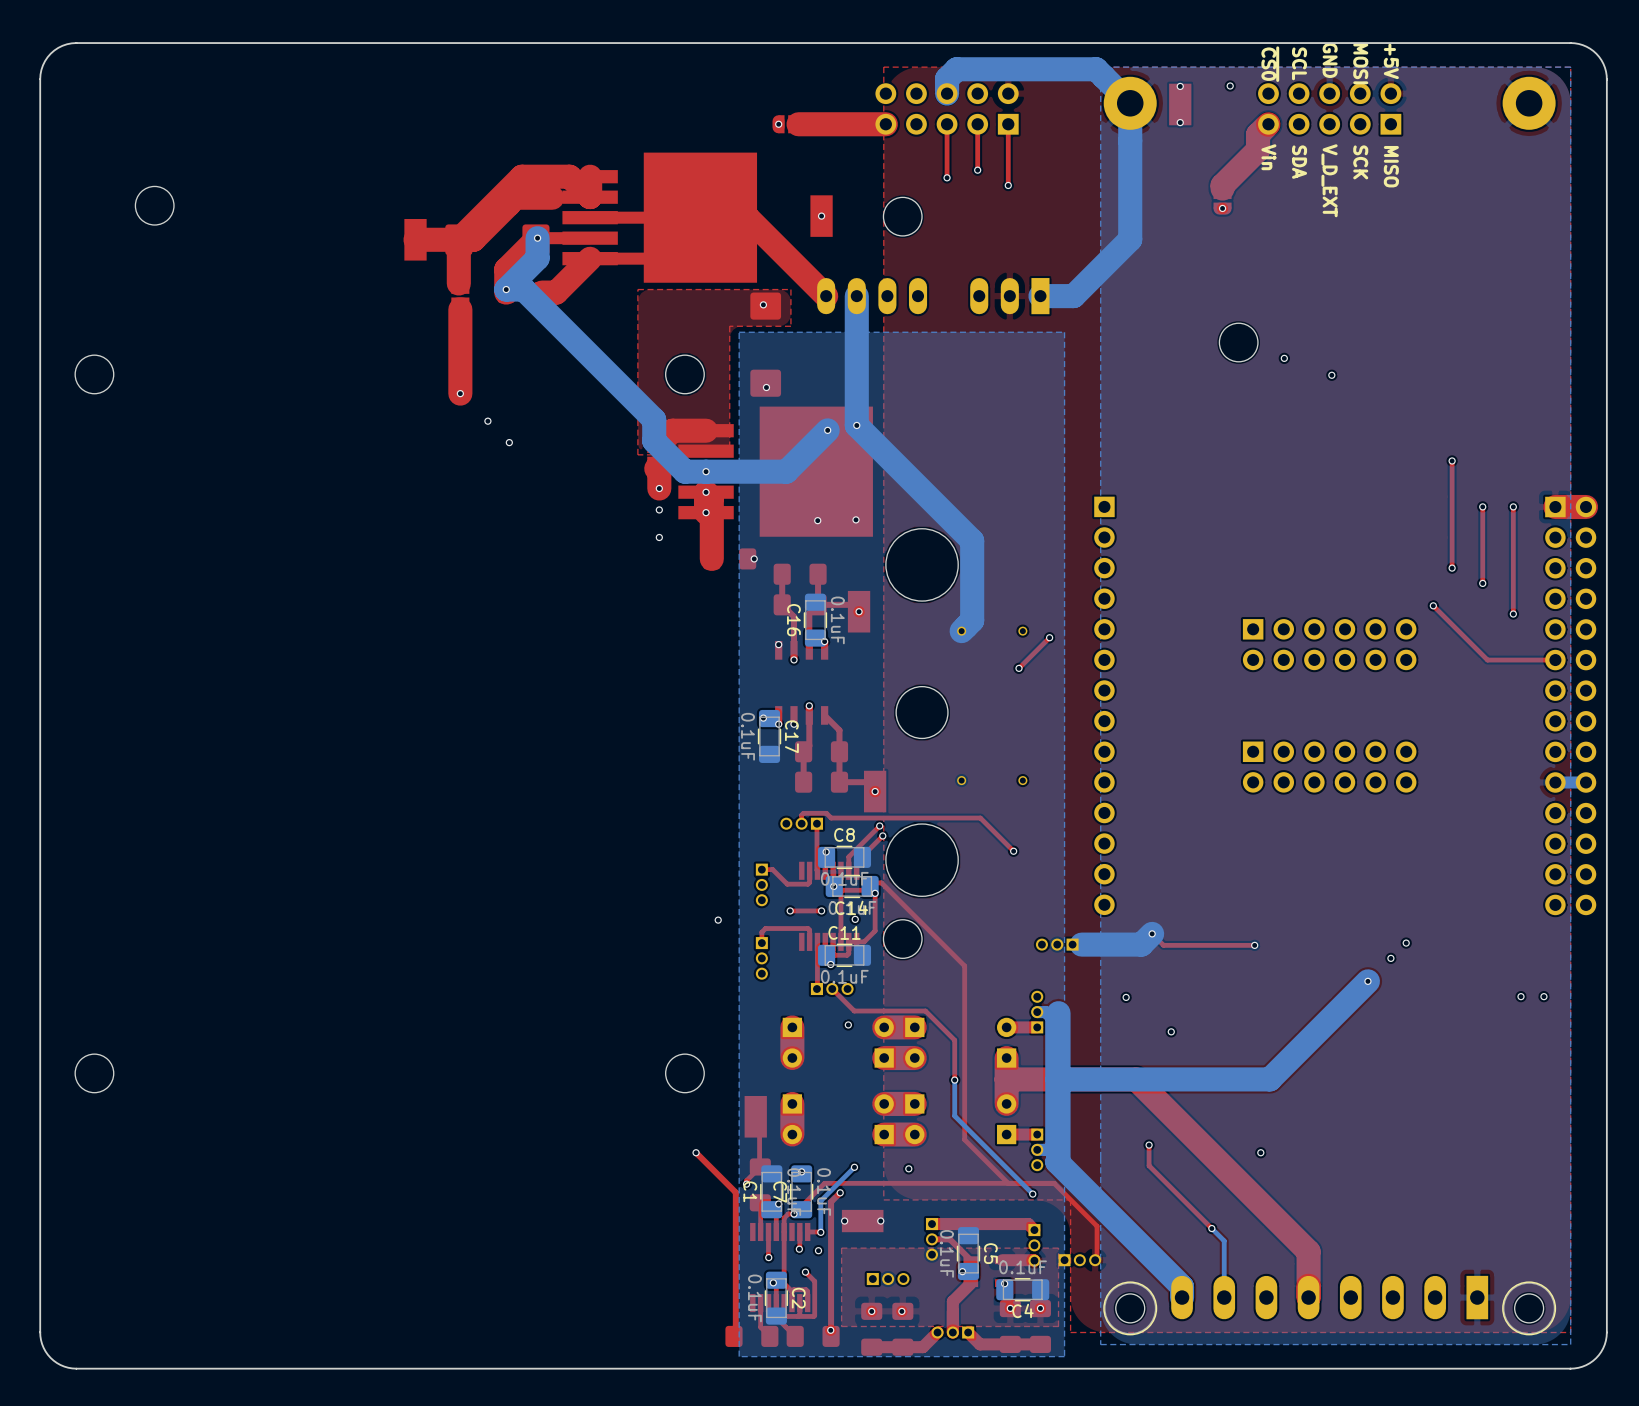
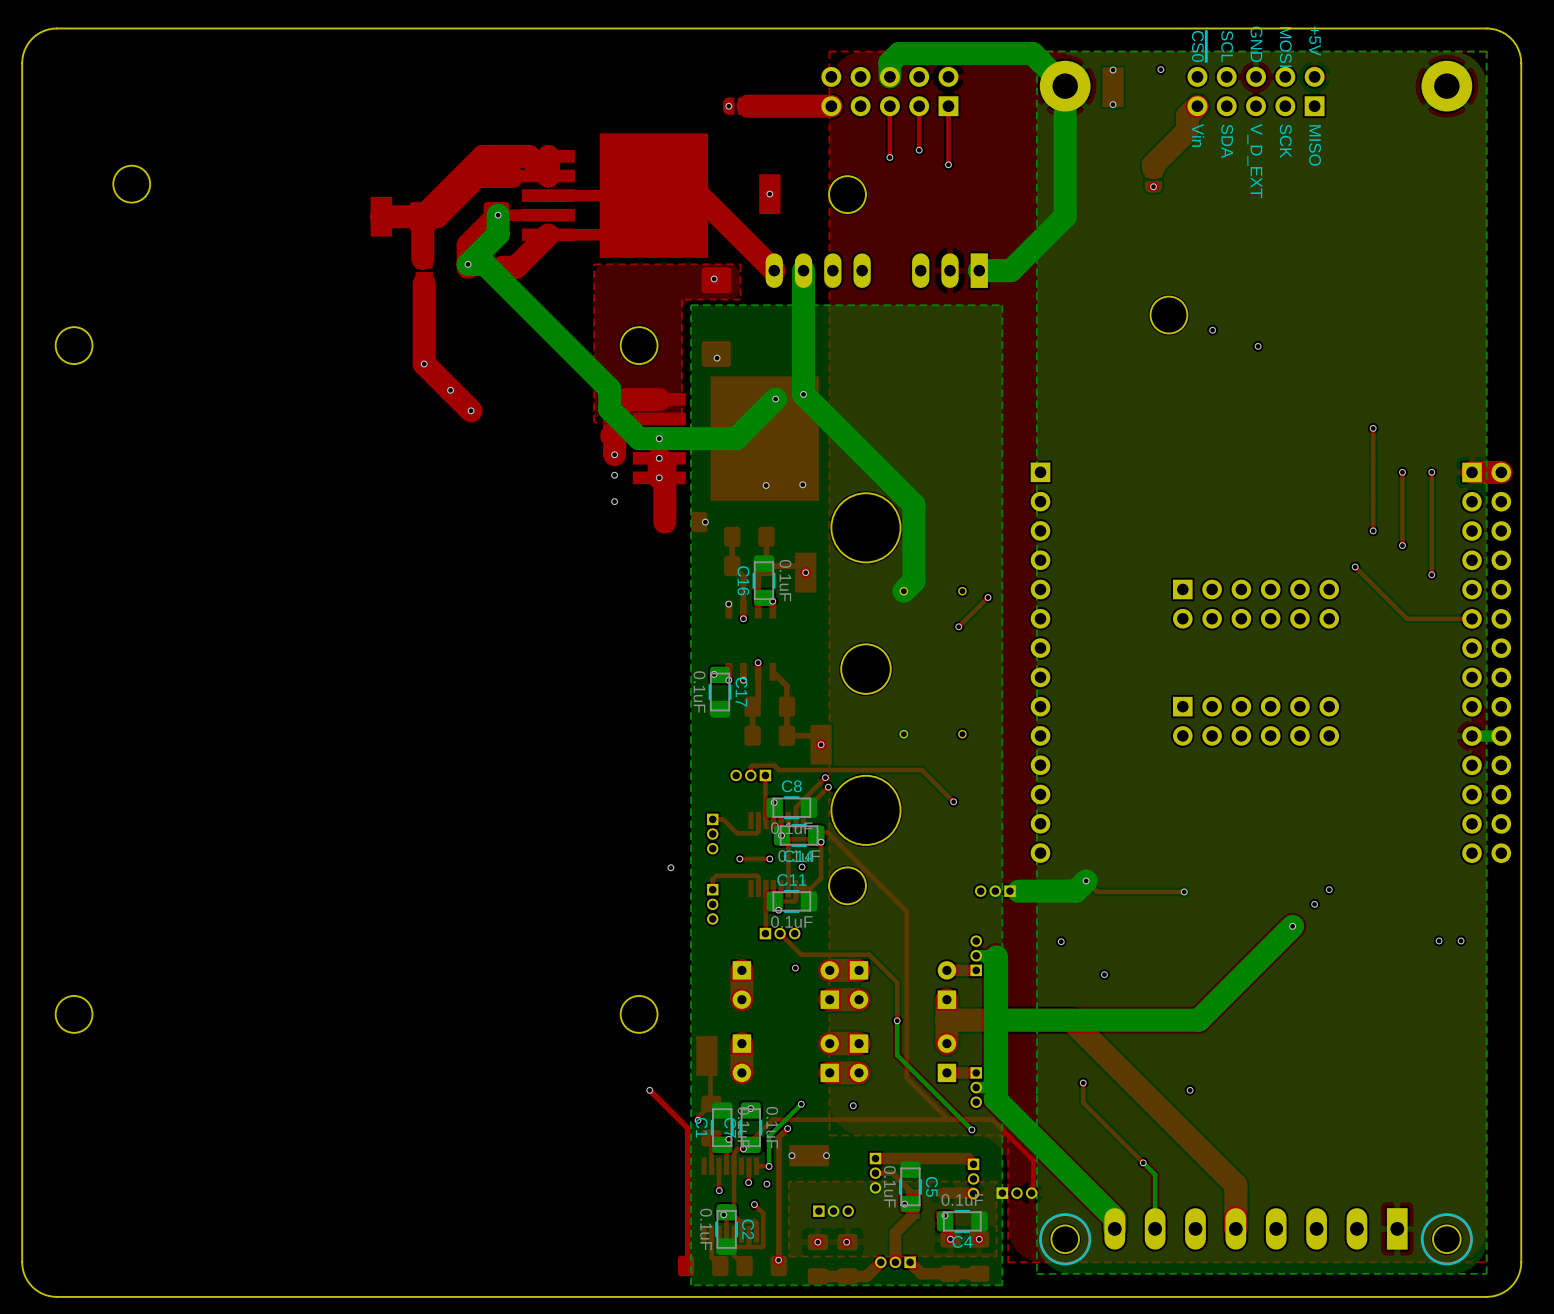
top track: none -> (424, 363) (471, 410)

